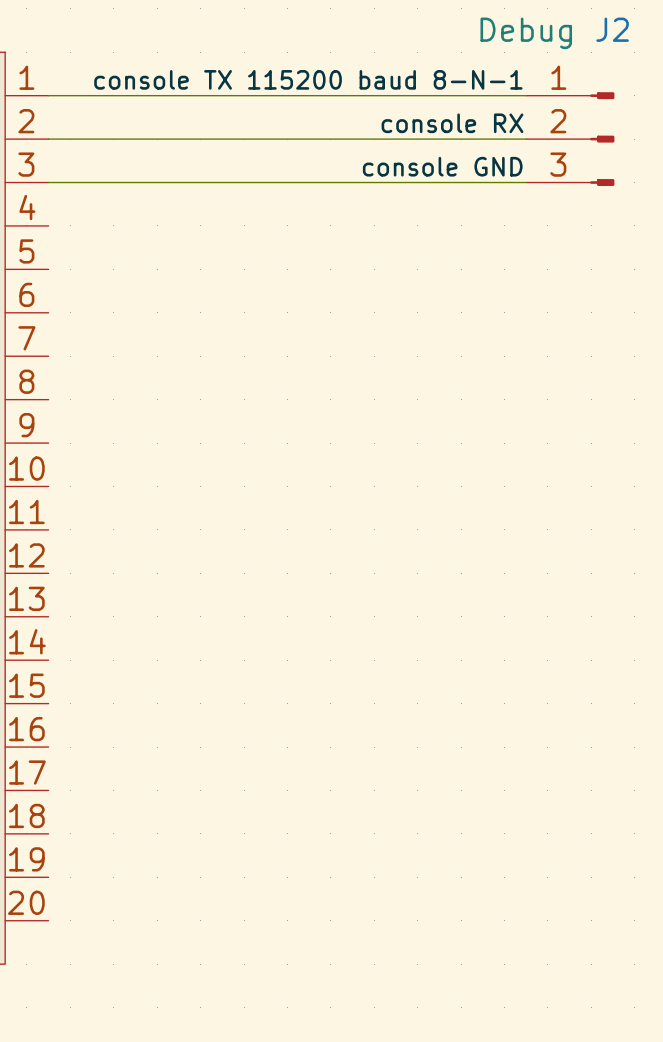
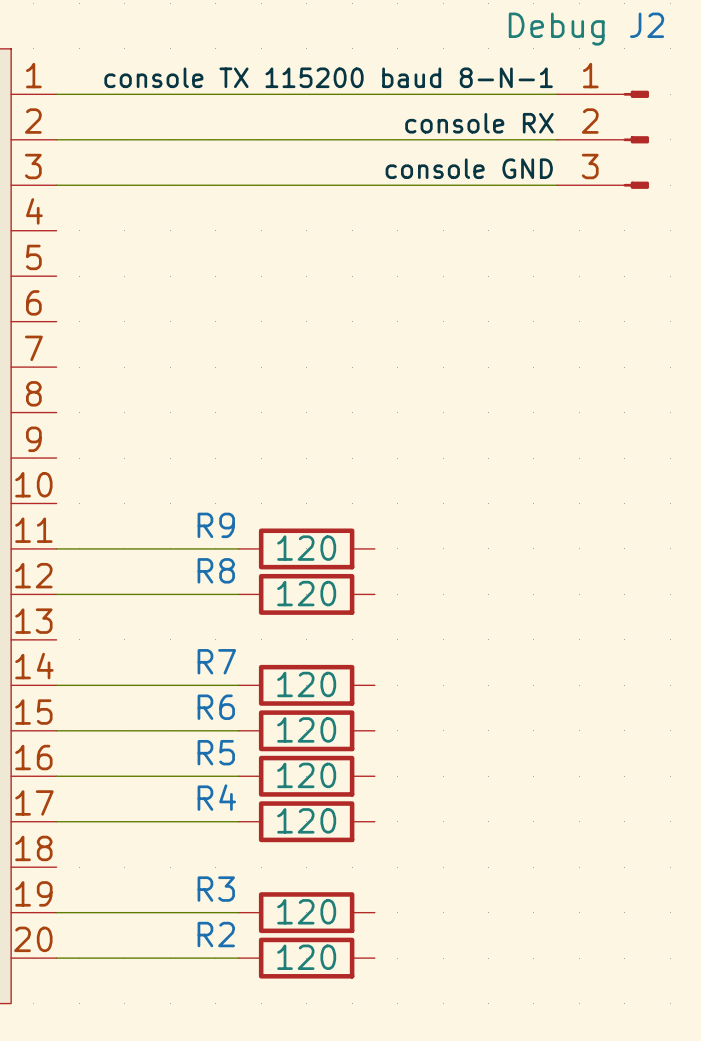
wire: none -> (56, 548) (238, 548)
R9: none -> 120 (306, 548)
wire: none -> (56, 594) (238, 594)
R8: none -> 120 (306, 594)
wire: none -> (56, 685) (238, 685)
R7: none -> 120 (306, 685)
wire: none -> (56, 730) (238, 730)
R6: none -> 120 (306, 730)
wire: none -> (56, 776) (238, 776)
R5: none -> 120 (306, 776)
wire: none -> (56, 821) (238, 821)
R4: none -> 120 (306, 821)
wire: none -> (56, 912) (238, 912)
R3: none -> 120 (306, 912)
wire: none -> (56, 958) (238, 958)
R2: none -> 120 (306, 958)

